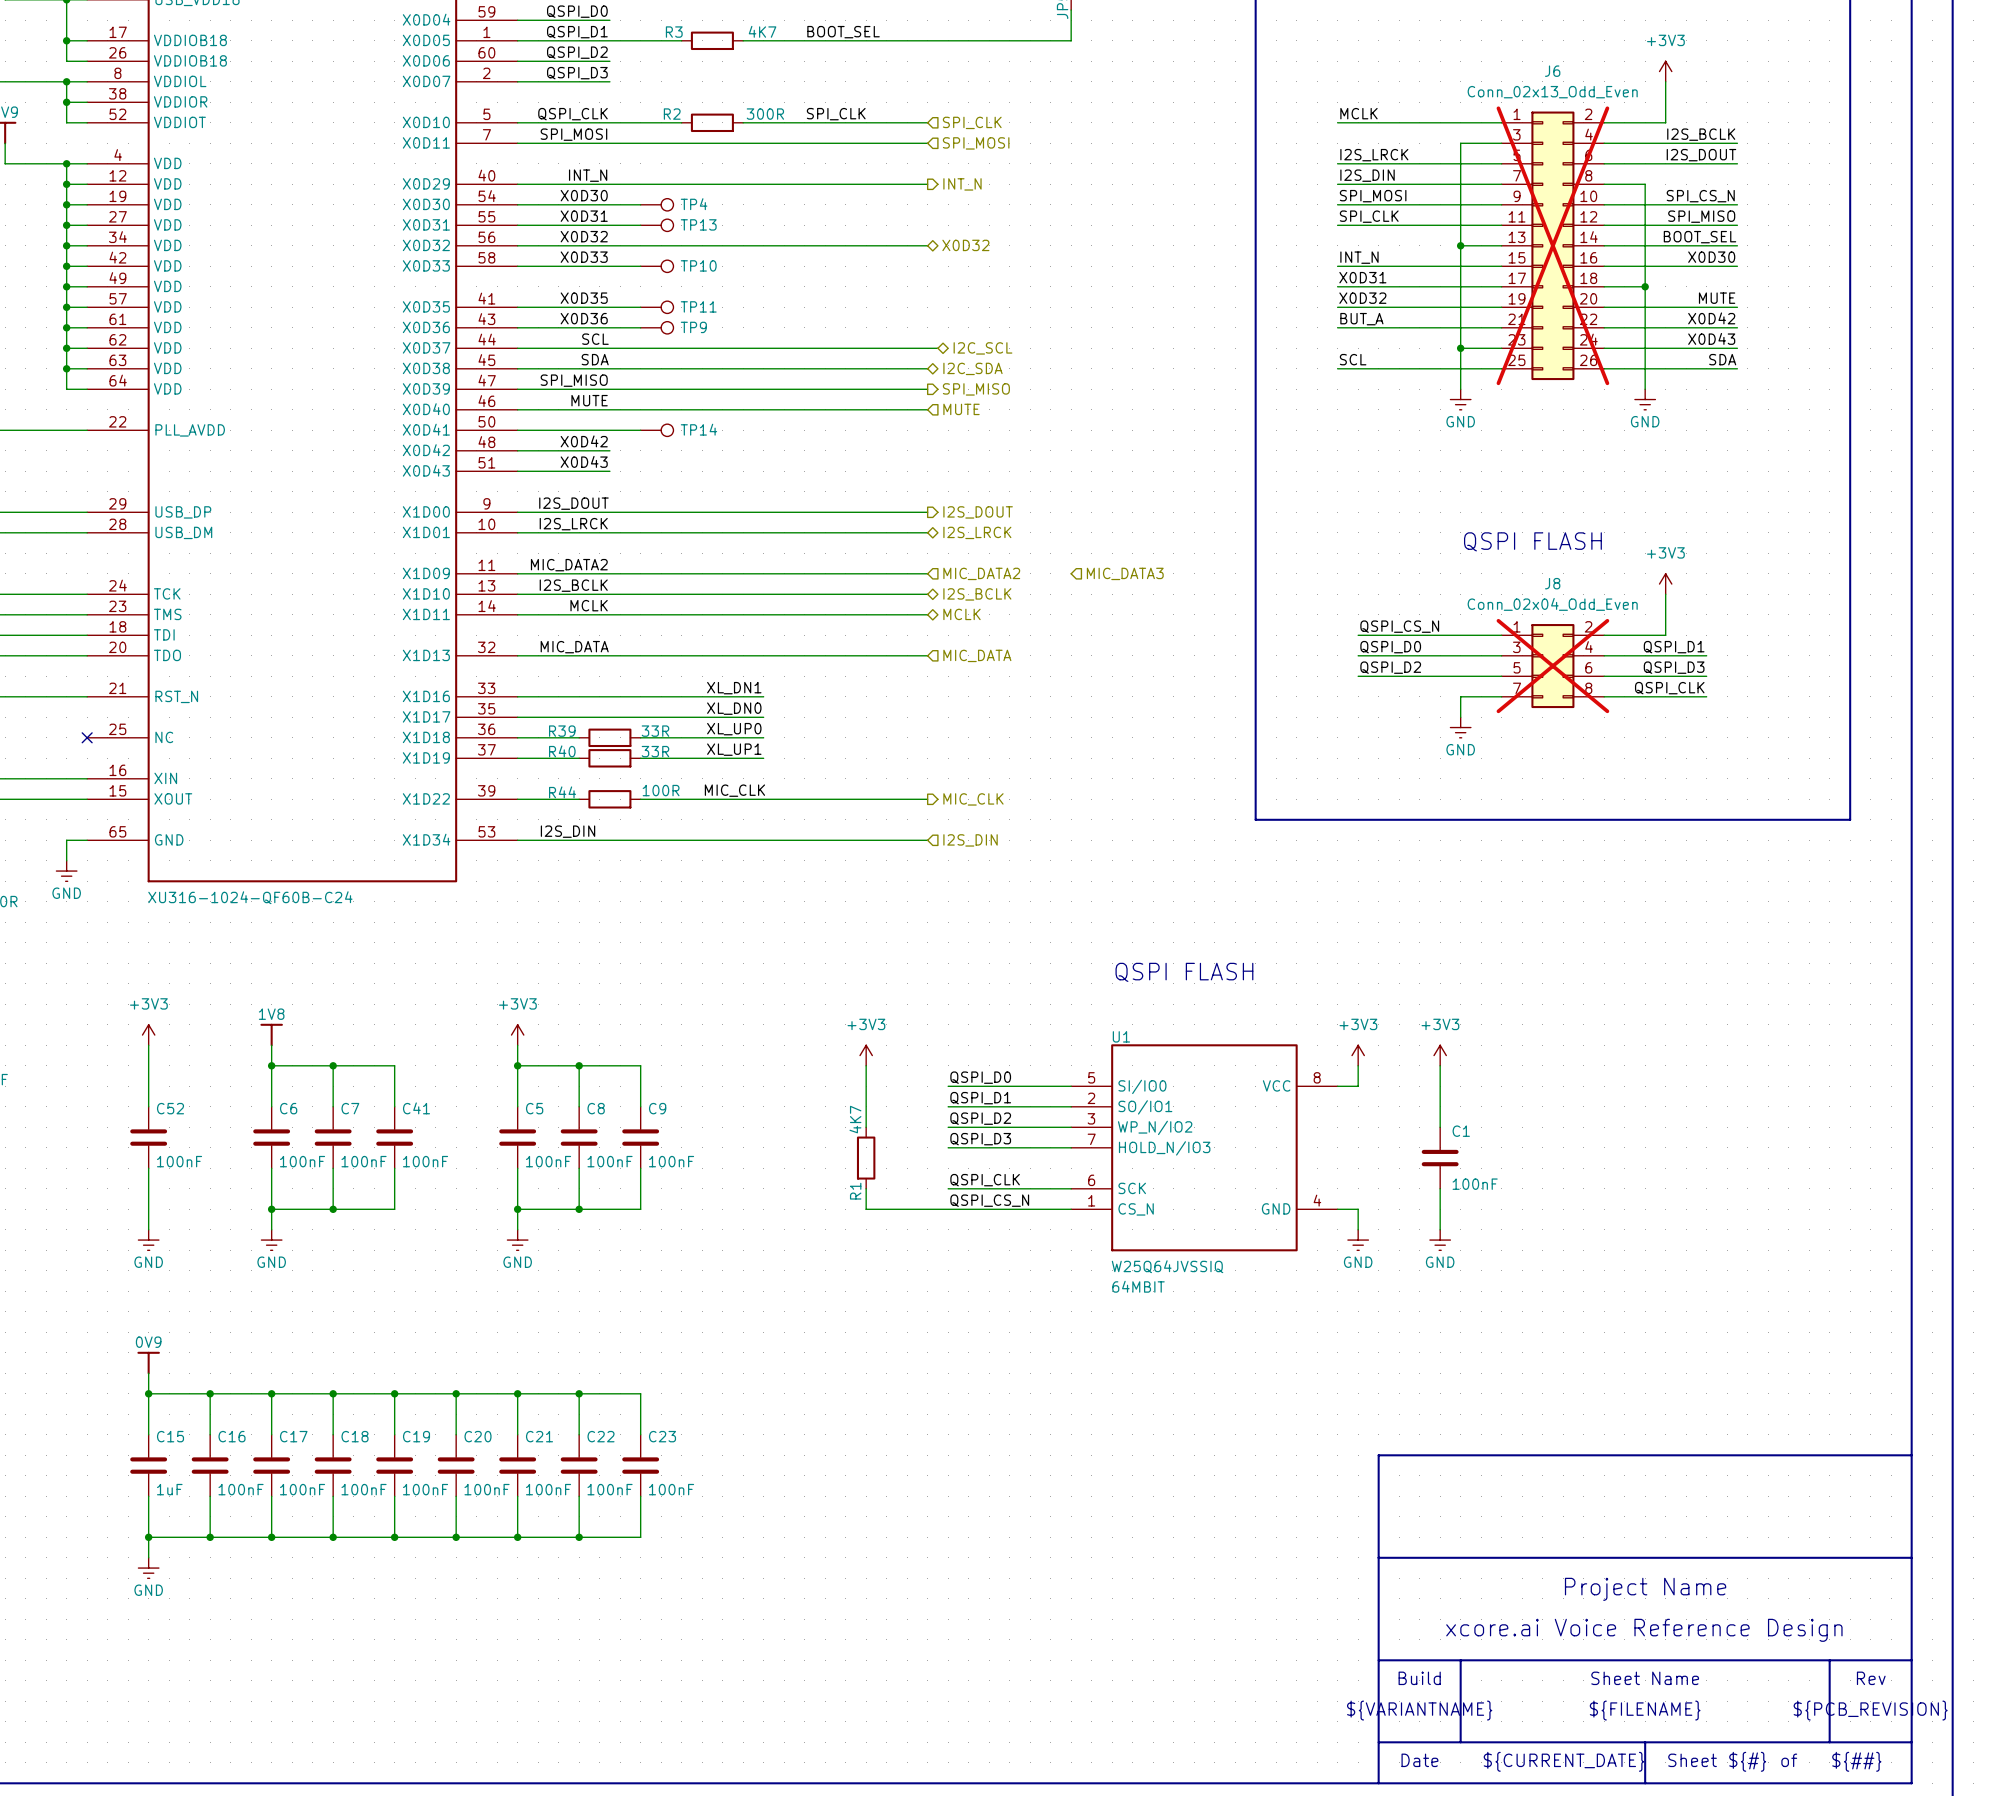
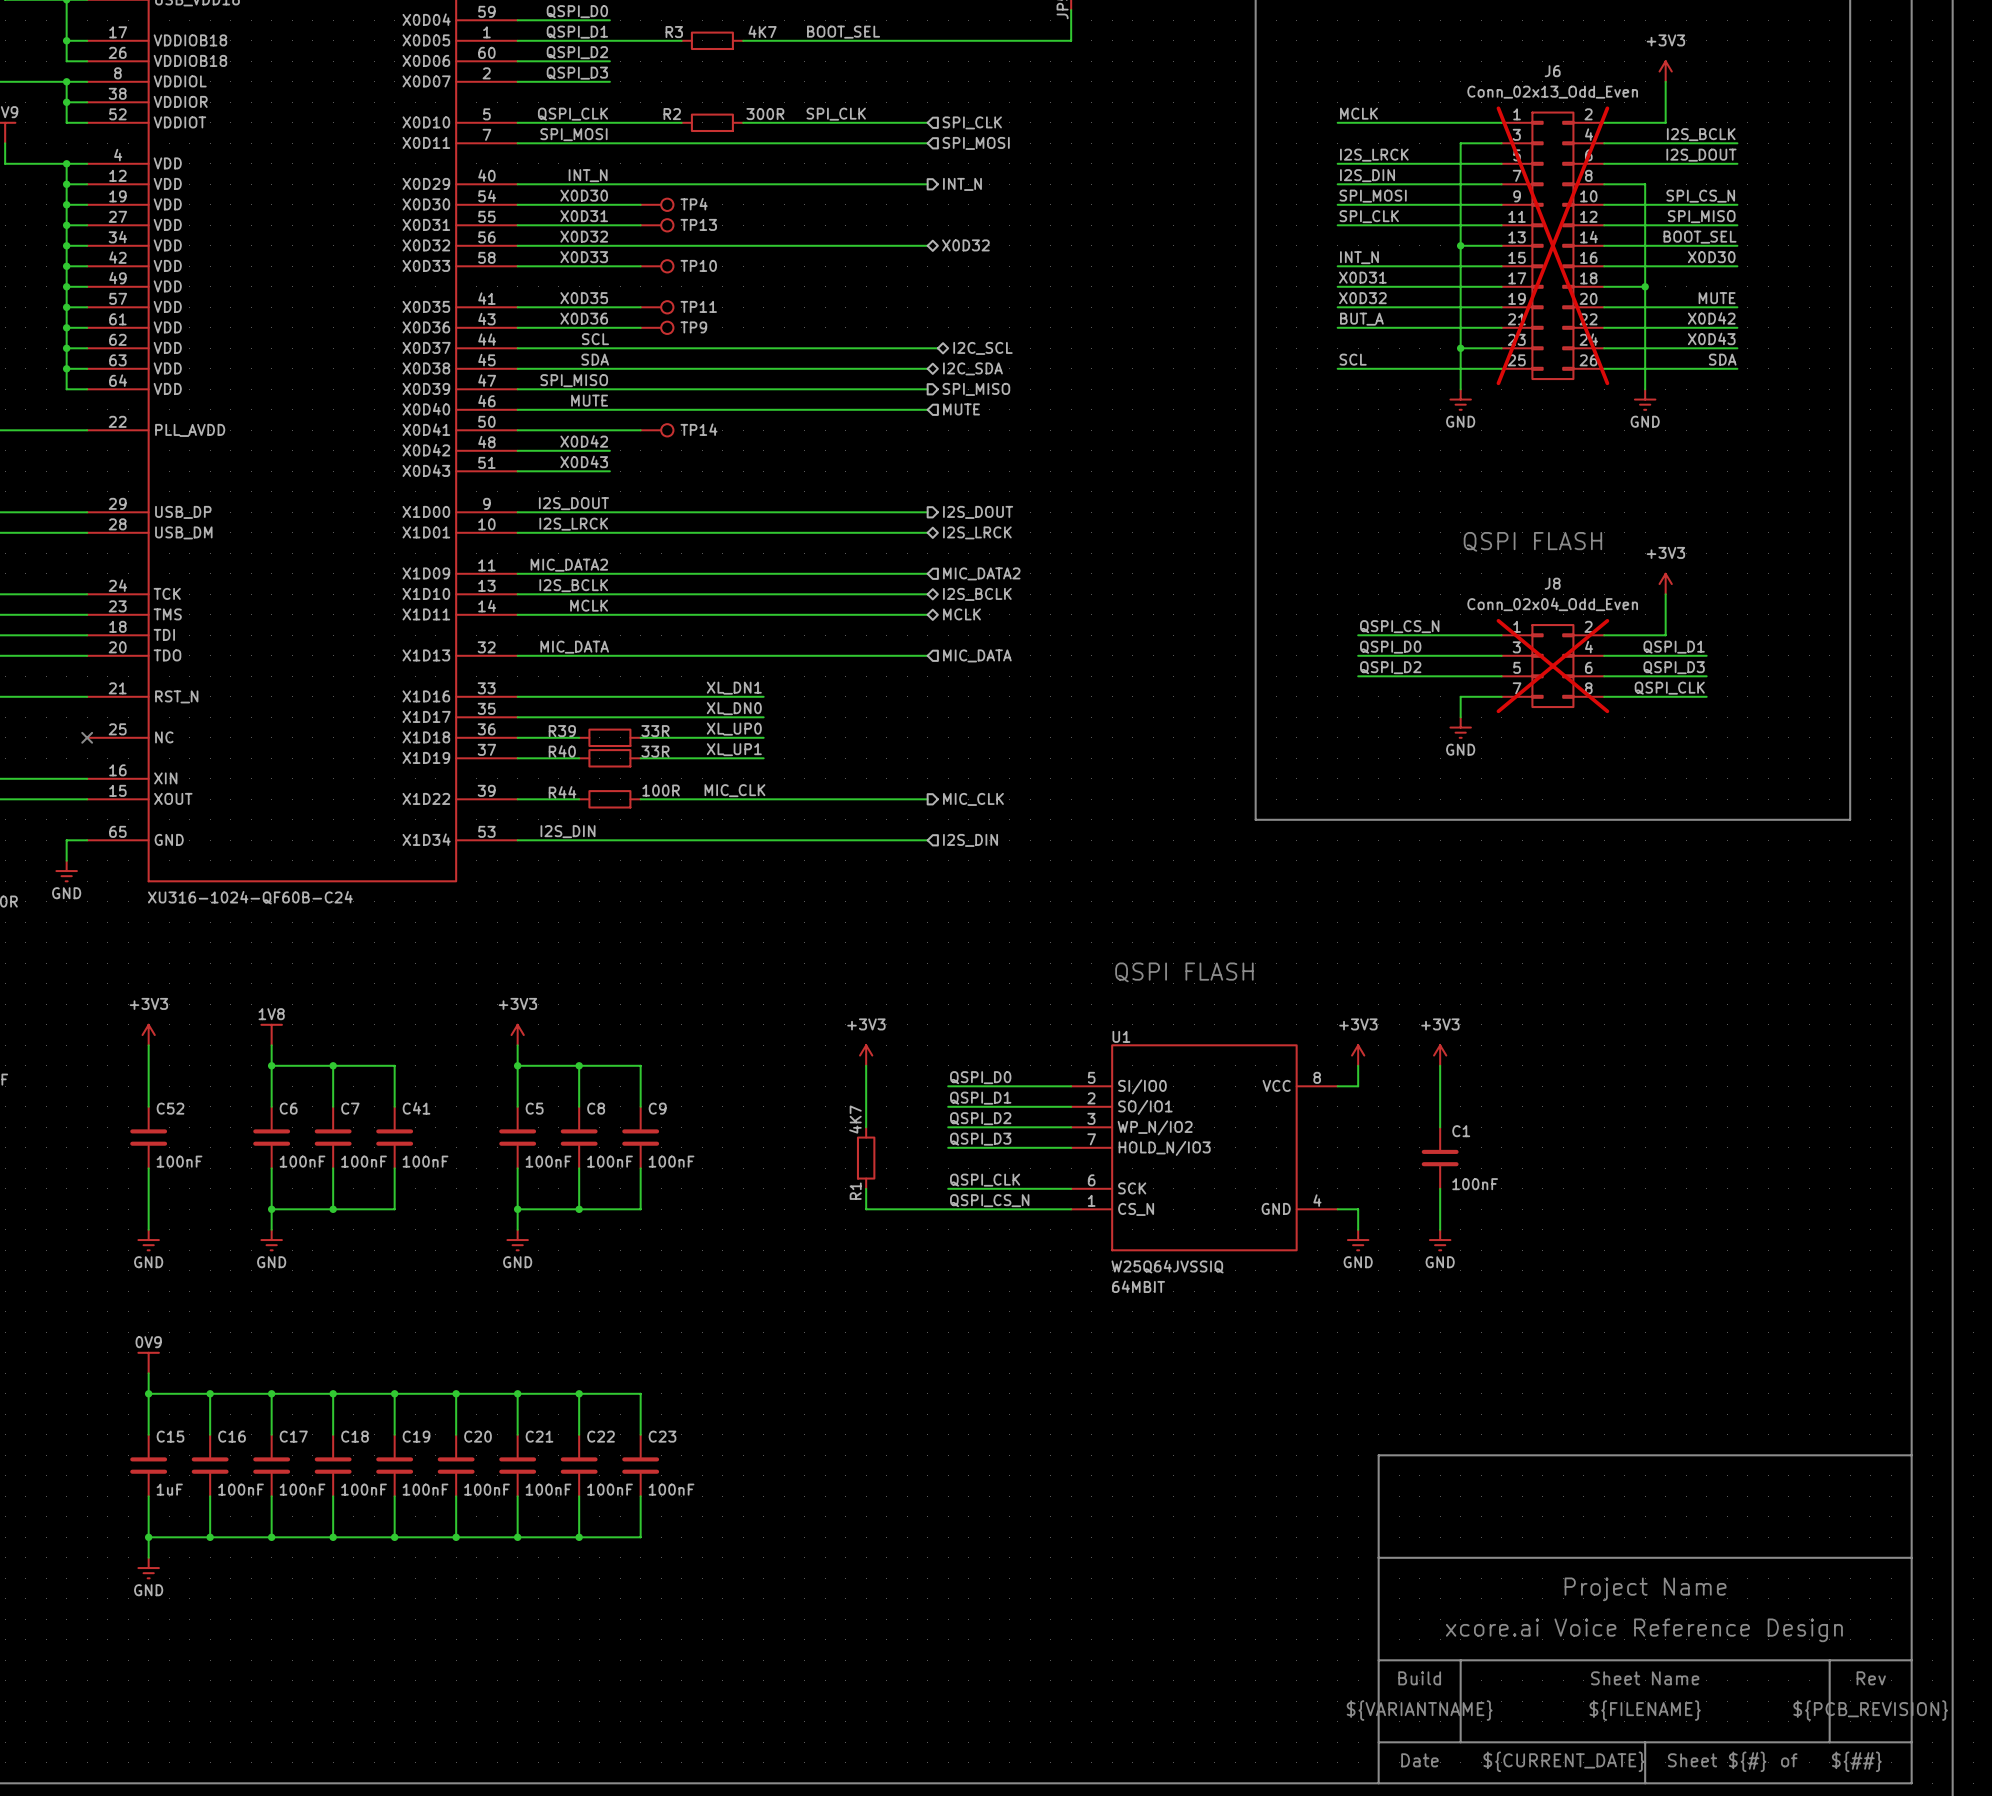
hierarchical label: MIC_DATA3 (1125, 573) -> none

